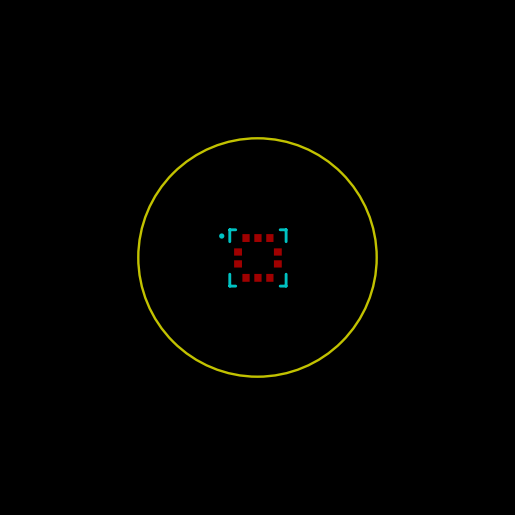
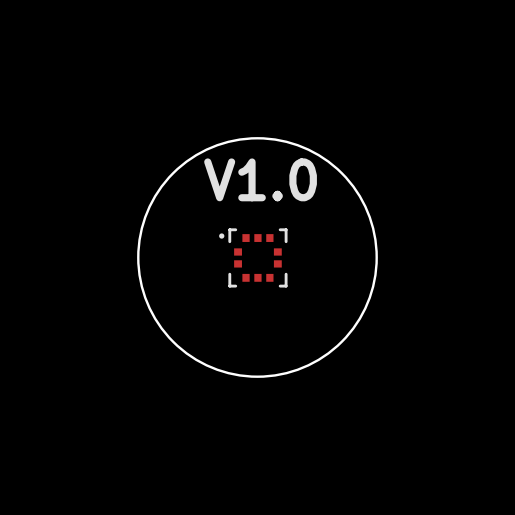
text: none -> V1.0 (260, 179)

